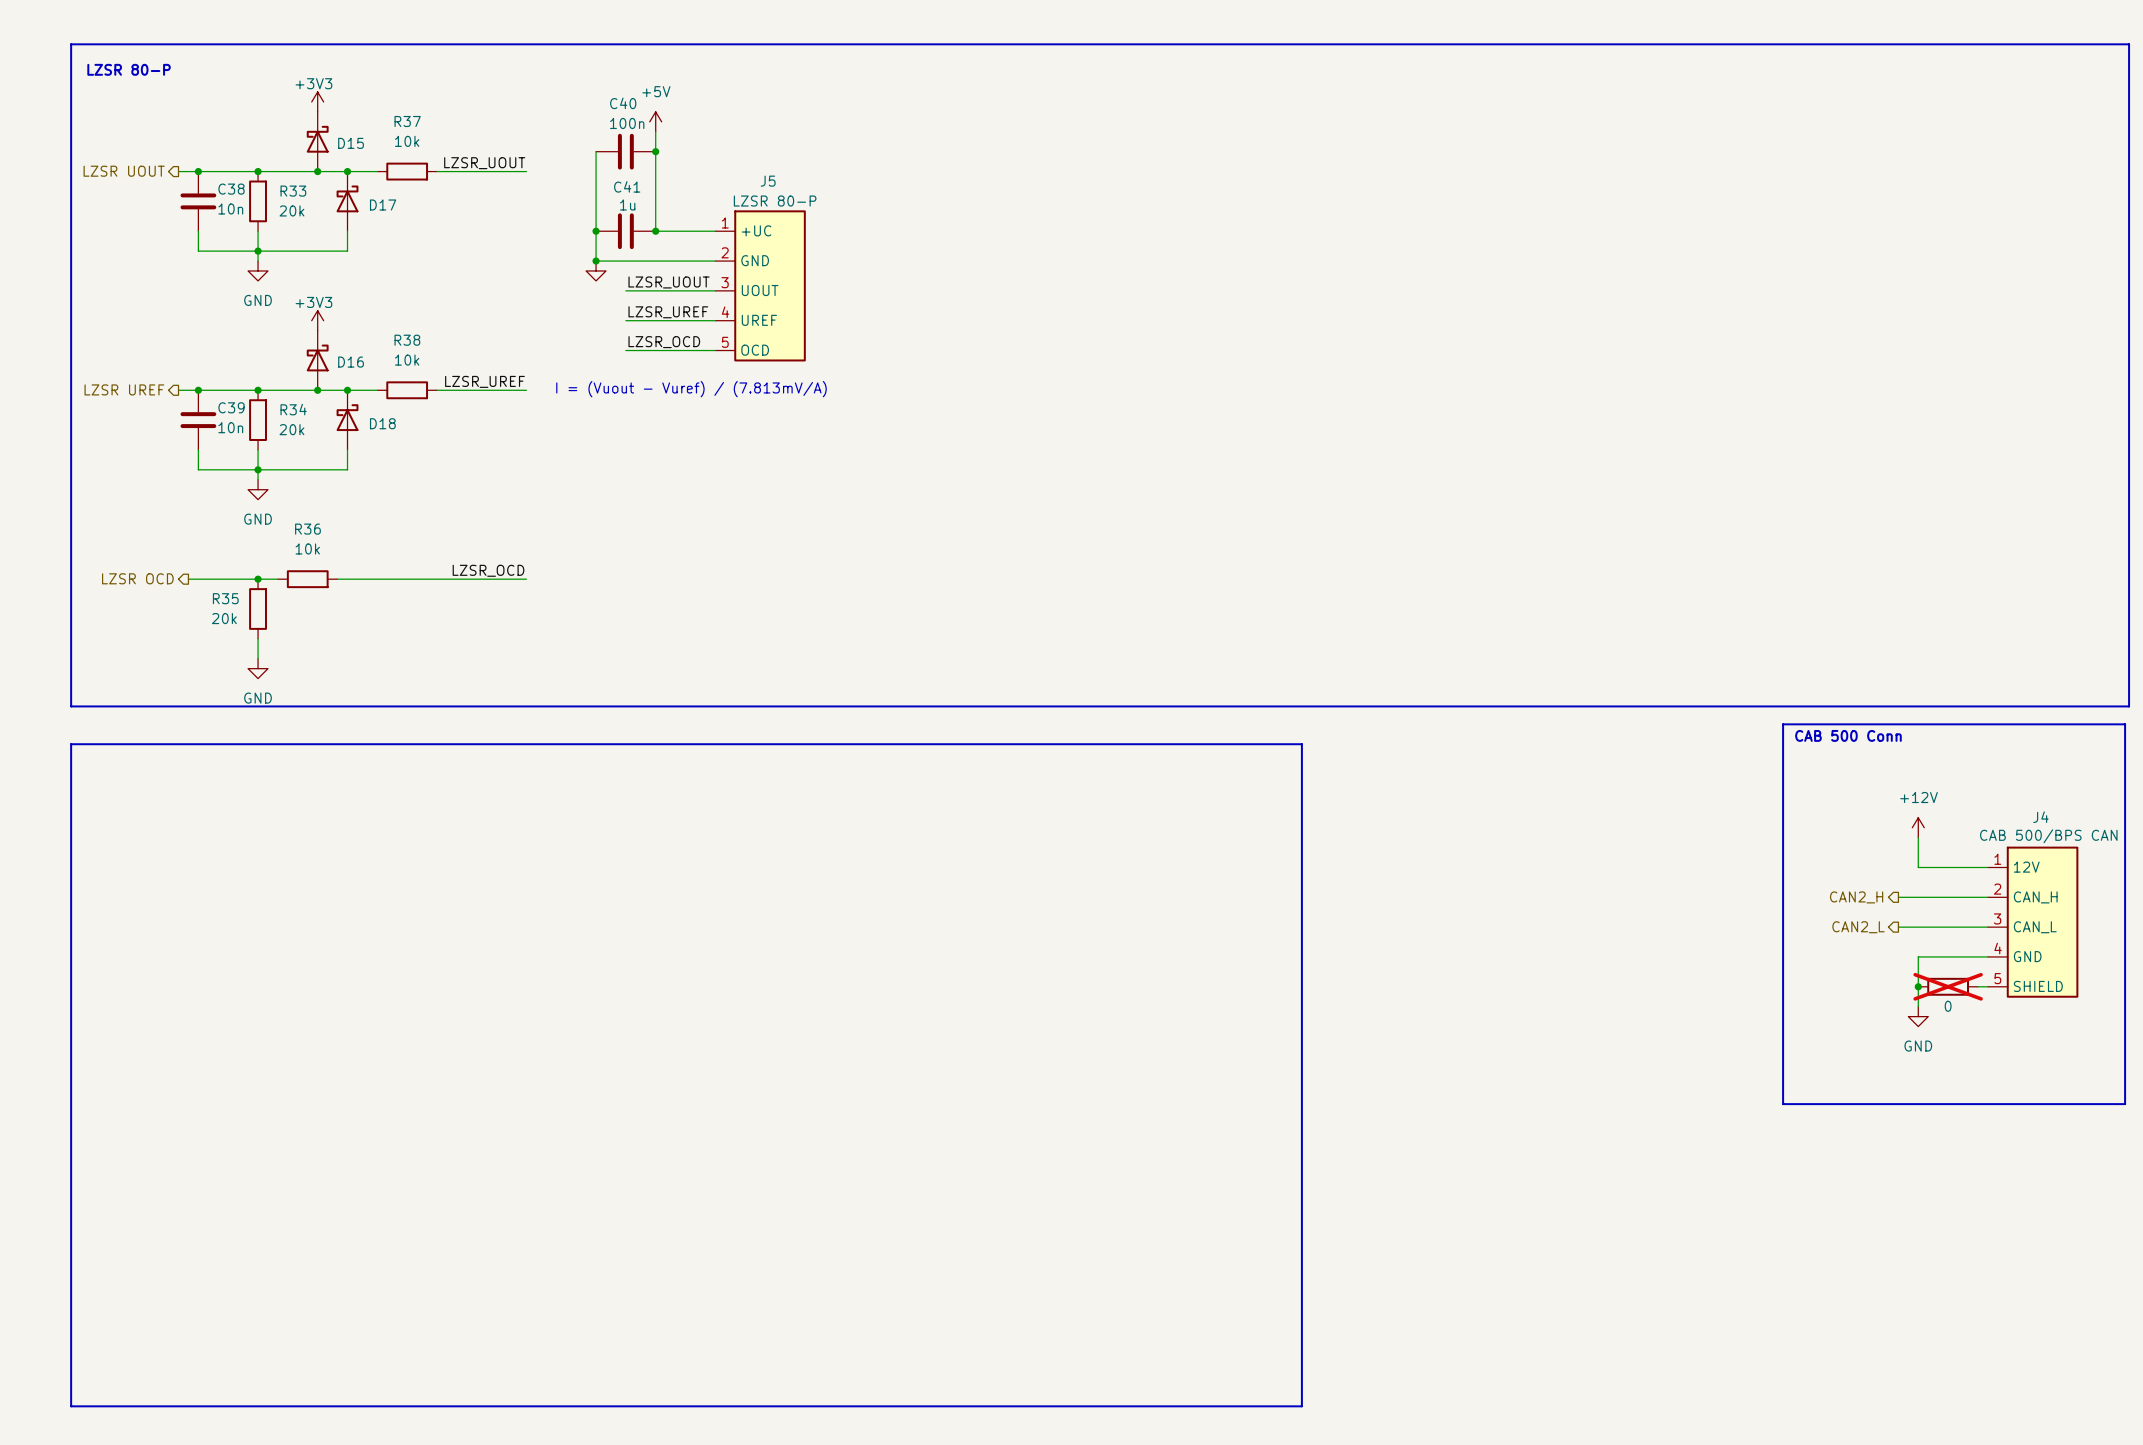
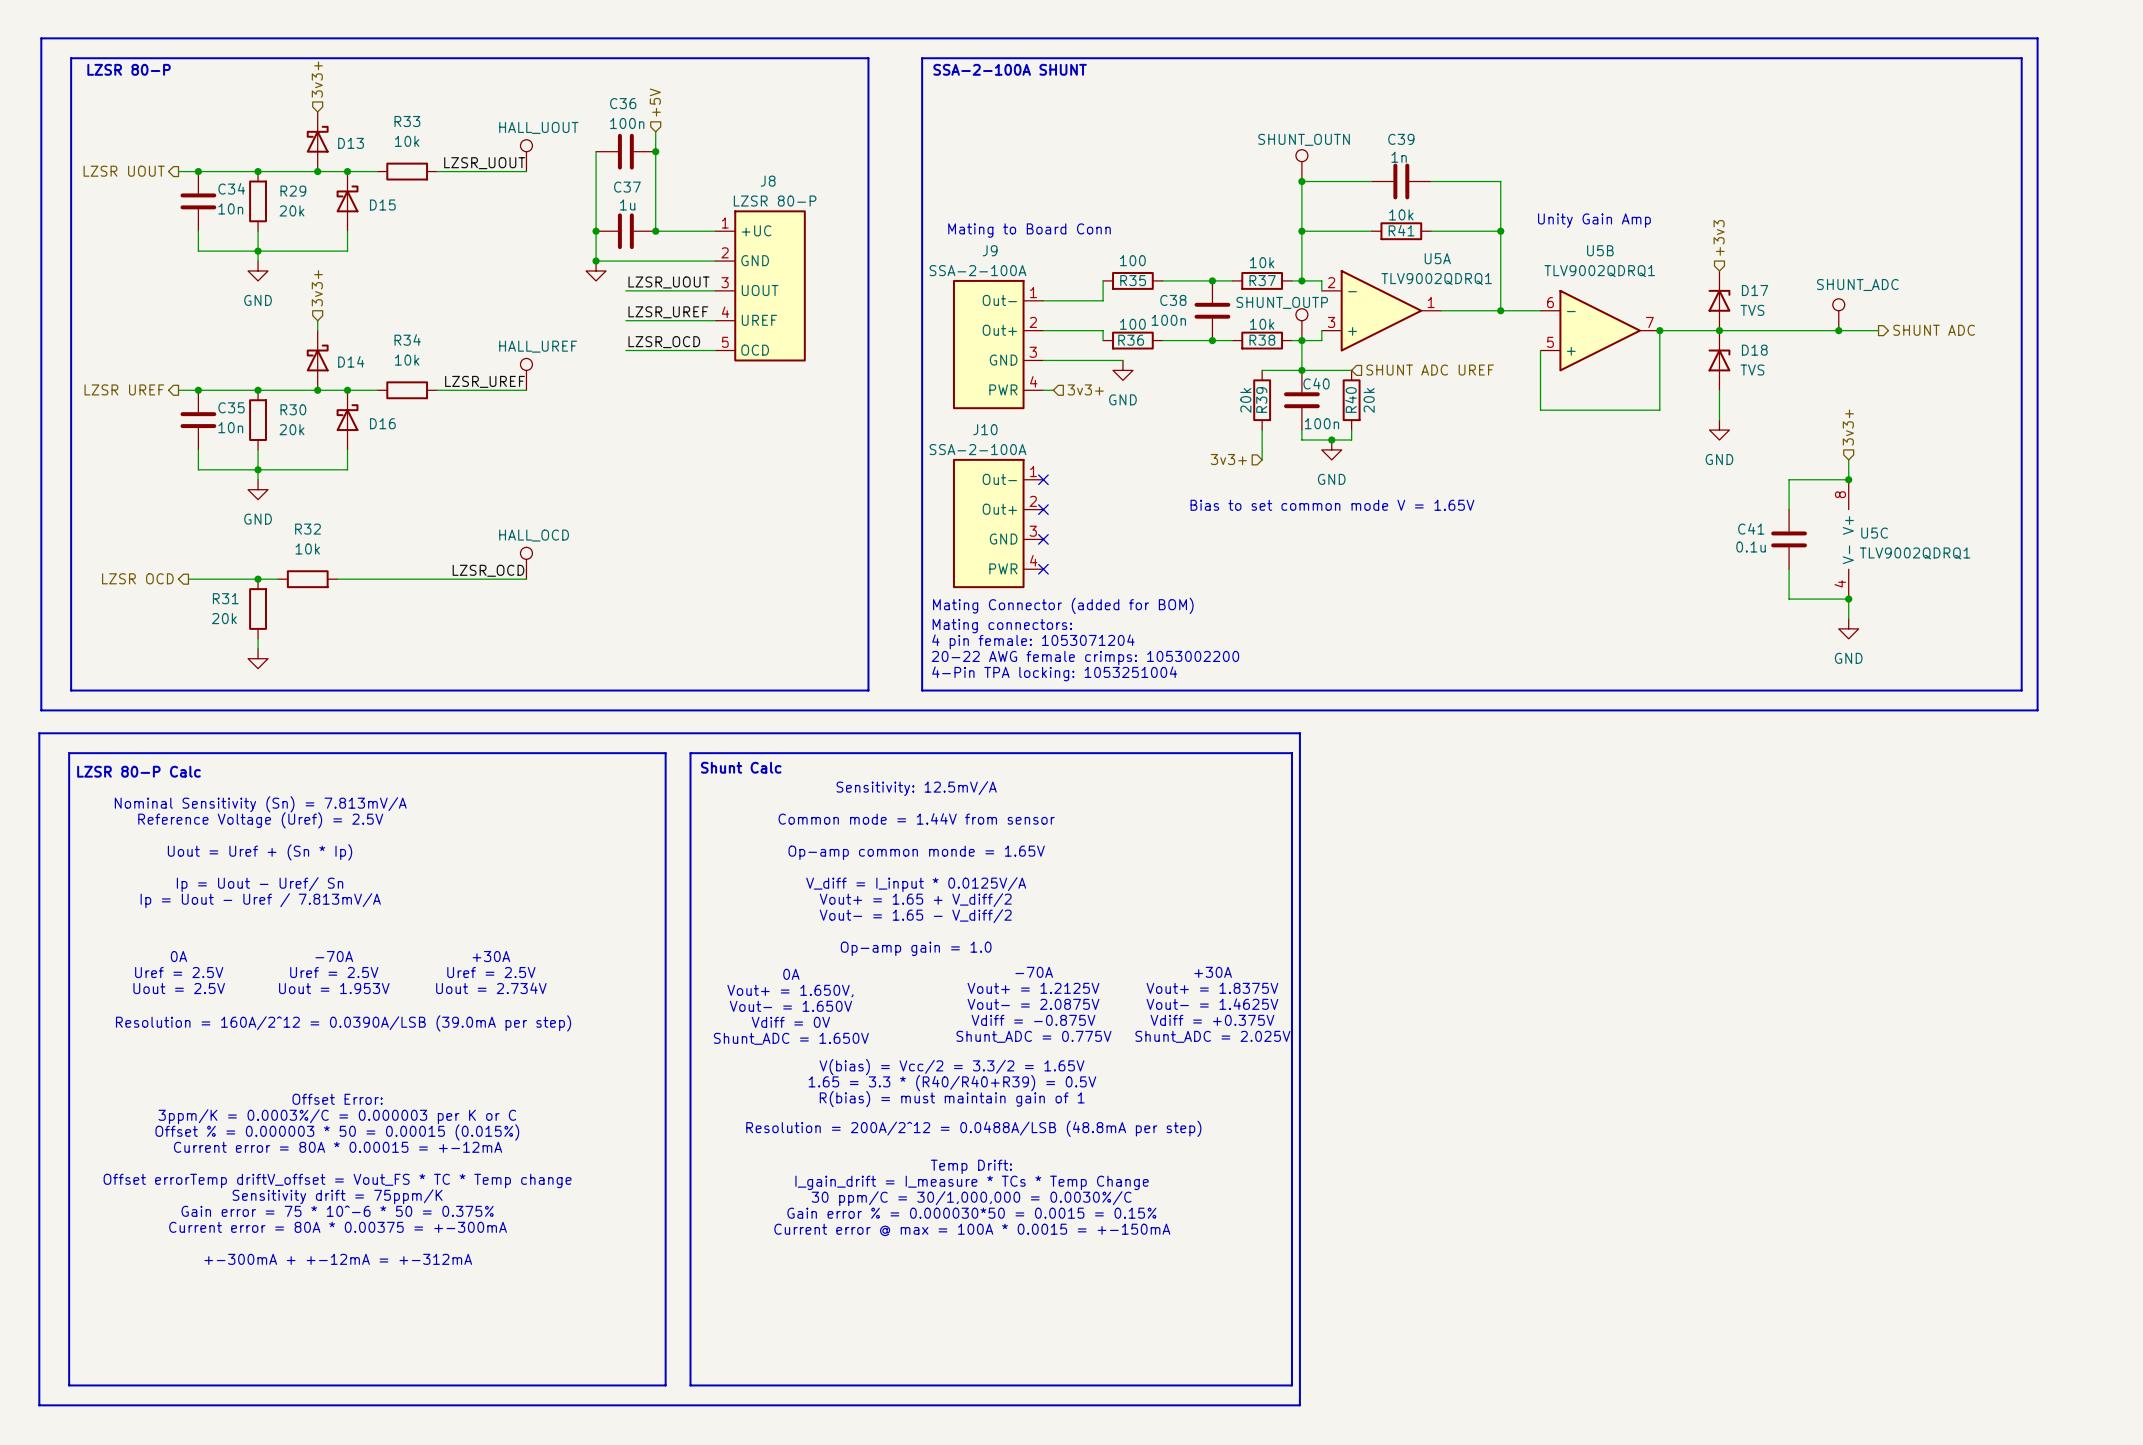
line: none -> (41, 38) (2037, 38) (2037, 710) (41, 710) (41, 38)
line: (71, 58) (71, 44) (2129, 44) (2129, 706) (71, 706) (71, 690) -> (71, 58) (868, 58) (868, 690) (71, 690)
line: none -> (922, 58) (2021, 58) (2021, 690) (922, 690) (922, 58)
text: none -> SSA-2-100A SHUNT (1010, 69)
hierarchical label: none -> 3v3+ (317, 79)
power symbol: +3V3 (317, 101) -> none
hierarchical label: none -> +5V (655, 102)
C40 name: C40 (623, 103) -> C36 (623, 103)
R37 name: R37 (407, 121) -> R33 (407, 121)
power symbol: +5V (655, 121) -> none
D15 name: D15 (351, 143) -> D13 (351, 143)
part: none -> HALL_UOUT (526, 155)
part: none -> SHUNT_OUTN (1301, 165)
J5 name: J5 (768, 181) -> J8 (768, 181)
junction: none -> (1301, 181)
wire: none -> (1371, 181) (1301, 181) (1301, 280)
C39: none -> 1n (1401, 181)
wire: none -> (1431, 181) (1500, 181) (1500, 310)
C41 name: C41 (627, 186) -> C37 (627, 187)
C38 name: C38 (231, 189) -> C34 (231, 188)
R33 name: R33 (293, 191) -> R29 (293, 191)
D17 name: D17 (383, 205) -> D15 (382, 205)
text: none -> Unity Gain Amp (1594, 220)
text: none -> Mating to Board Conn (1029, 230)
wire: none -> (1301, 231) (1371, 231)
junction: none -> (1301, 231)
R41: none -> 10k (1401, 231)
wire: none -> (1431, 231) (1500, 231)
junction: none -> (1500, 231)
hierarchical label: none -> +3v3 (1719, 237)
wire: none -> (1103, 280) (1103, 300) (1043, 300)
R35: none -> 100 (1132, 280)
wire: none -> (1162, 280) (1232, 280)
junction: none -> (1212, 280)
R37: none -> 10k (1262, 280)
wire: none -> (1291, 280) (1321, 280) (1321, 290)
junction: none -> (1301, 280)
hierarchical label: none -> 3v3+ (317, 288)
D17: none -> TVS (1719, 300)
C38: none -> 100n (1212, 310)
U5A: none -> TLV9002QDRQ1 (1381, 310)
wire: none -> (1441, 310) (1540, 310)
junction: none -> (1500, 310)
part: none -> SHUNT_ADC (1838, 314)
power symbol: +3V3 (317, 320) -> none
part: none -> SHUNT_OUTP (1301, 324)
wire: none -> (1043, 330) (1103, 330) (1103, 340)
wire: none -> (1321, 330) (1321, 340) (1291, 340)
U5B: none -> TLV9002QDRQ1 (1600, 330)
junction: none -> (1659, 330)
junction: none -> (1719, 330)
junction: none -> (1838, 330)
wire: none -> (1878, 330) (1659, 330) (1659, 410) (1540, 410) (1540, 350)
hierarchical label: none -> SHUNT ADC (1934, 330)
R38 name: R38 (407, 340) -> R34 (407, 339)
R36: none -> 100 (1132, 340)
wire: none -> (1162, 340) (1232, 340)
junction: none -> (1212, 340)
R38: none -> 10k (1262, 340)
wire: none -> (1301, 340) (1301, 370)
junction: none -> (1301, 340)
J9: none -> SSA-2-100A (998, 344)
wire: none -> (1043, 360) (1122, 360)
D18: none -> TVS (1719, 360)
D16 name: D16 (351, 362) -> D14 (351, 361)
power symbol: none -> GND (1122, 370)
wire: none -> (1262, 370) (1351, 370)
junction: none -> (1301, 370)
hierarchical label: none -> SHUNT ADC UREF (1430, 370)
part: none -> HALL_UREF (526, 374)
text: I = (Vuout - Vuref) / (7.813mV/A) (691, 389) -> none
hierarchical label: none -> 3v3+ (1085, 389)
wire: none -> (1043, 390) (1053, 390)
wire: none -> (1719, 390) (1719, 420)
R39: none -> 20k (1262, 400)
C40: none -> 100n (1301, 400)
R40: none -> 20k (1351, 400)
C39 name: C39 (231, 407) -> C35 (231, 407)
R34 name: R34 (293, 409) -> R30 (293, 409)
D18 name: D18 (382, 423) -> D16 (382, 423)
hierarchical label: none -> 3v3+ (1848, 427)
wire: none -> (1262, 430) (1262, 459)
wire: none -> (1301, 430) (1301, 440) (1351, 440) (1351, 430)
power symbol: none -> GND (1719, 430)
junction: none -> (1331, 440)
power symbol: none -> GND (1331, 449)
hierarchical label: none -> 3v3+ (1228, 459)
wire: none -> (1848, 459) (1848, 479) (1789, 479) (1789, 509)
no-connect mark: none -> (1043, 479)
junction: none -> (1848, 479)
text: none -> Bias to set common mode V = 1.65V (1332, 505)
no-connect mark: none -> (1043, 509)
J10: none -> SSA-2-100A (998, 523)
R36 name: R36 (307, 529) -> R32 (307, 529)
no-connect mark: none -> (1043, 539)
C41: none -> 0.1u (1789, 539)
U5C: none -> TLV9002QDRQ1 (1848, 539)
part: none -> HALL_OCD (526, 563)
no-connect mark: none -> (1043, 569)
wire: none -> (1789, 569) (1789, 599) (1848, 599) (1848, 618)
R35 name: R35 (225, 598) -> R31 (225, 598)
junction: none -> (1848, 599)
text: none -> Mating Connector (added for BOM) (1063, 605)
text: none -> Mating connectors: (1002, 626)
power symbol: none -> GND (1848, 628)
text: none -> 4 pin female: 1053071204 (1033, 641)
power symbol: none -> (258, 658)
text: none -> 20-22 AWG female crimps: 1053002200 (1085, 658)
power symbol: GND (258, 668) -> none
text: none -> 4-Pin TPA locking: 1053251004 (1054, 673)
line: (1783, 724) (2125, 724) (2125, 1104) (1783, 1104) (1783, 724) -> none
text: CAB 500 Conn (1848, 735) -> none
line: (71, 744) (1301, 744) (1301, 1406) (71, 1406) (71, 744) -> (39, 733) (39, 1405) (1299, 1405) (1299, 733) (39, 733)
line: none -> (69, 753) (665, 753) (665, 1385) (69, 1385) (69, 753)
line: none -> (690, 753) (1291, 753) (1291, 1385) (690, 1385) (690, 753)
text: none -> Shunt Calc (741, 767)
text: none -> LZSR 80-P Calc (138, 771)
text: none -> Sensitivity: 12.5mV/A (916, 788)
text: none -> Nominal Sensitivity (Sn) = 7.813mV/A (260, 804)
text: none -> Common mode = 1.44V from sensor (916, 818)
text: none -> Reference Voltage (Uref) = 2.5V (260, 820)
power symbol: +12V (1918, 827) -> none
wire: (1918, 837) (1918, 867) (1987, 867) -> none
text: none -> Uout = Uref + (Sn * Ip) (260, 852)
text: none -> Op-amp common monde = 1.65V (916, 852)
text: none -> Ip = Uout - Uref/ Sn (260, 884)
text: none -> V_diff = I_input * 0.0125V/A (916, 884)
hierarchical label: CAN2_H (1856, 897) -> none
wire: (1898, 897) (1987, 897) -> none
text: none -> Ip = Uout - Uref / 7.813mV/A (260, 900)
text: none -> Vout+ = 1.65 + V_diff/2 (915, 900)
text: none -> Vout- = 1.65 - V_diff/2 (915, 916)
J4: CAB 500/BPS CAN (2033, 922) -> none
hierarchical label: CAN2_L (1858, 927) -> none
wire: (1898, 927) (1987, 927) -> none
text: none -> Op-amp gain = 1.0 (916, 948)
text: none -> 0A (178, 956)
text: none -> -70A (334, 956)
text: none -> +30A (491, 956)
wire: (1987, 956) (1918, 956) (1918, 1006) -> none
text: none -> Uref = 2.5V (179, 972)
text: none -> Uref = 2.5V (334, 972)
text: none -> Uref = 2.5V (491, 972)
text: none -> -70A (1034, 972)
text: none -> +30A (1213, 972)
text: none -> 0A (791, 974)
junction: (1918, 986) -> none
part: 0 (1948, 986) -> none
wire: (1977, 986) (1987, 986) -> none
text: none -> Uout = 2.5V (179, 988)
text: none -> Uout = 1.953V (334, 988)
text: none -> Uout = 2.734V (491, 988)
text: none -> Vout+ = 1.2125V (1033, 988)
text: none -> Vout+ = 1.8375V (1212, 988)
text: none -> Vout+ = 1.650V, (790, 991)
text: none -> Vout- = 2.0875V (1033, 1004)
text: none -> Vout- = 1.4625V (1212, 1004)
text: none -> Vout- = 1.650V (790, 1006)
power symbol: GND (1918, 1016) -> none
text: none -> Vdiff = -0.875V (1033, 1020)
text: none -> Vdiff = +0.375V (1212, 1020)
text: none -> Vdiff = 0V (790, 1022)
text: none -> Resolution = 160A/2^12 = 0.0390A/LSB (39.0mA per step) (343, 1023)
text: none -> Shunt_ADC = 0.775V (1033, 1036)
text: none -> Shunt_ADC = 2.025V (1212, 1036)
text: none -> Shunt_ADC = 1.650V (791, 1038)
text: none -> V(bias) = Vcc/2 = 3.3/2 = 1.65V (951, 1067)
text: none -> 1.65 = 3.3 * (R40/R40+R39) = 0.5V (952, 1083)
text: none -> Offset Error: (337, 1099)
text: none -> R(bias) = must maintain gain of 1 (952, 1099)
text: none -> 3ppm/K = 0.0003%/C = 0.000003 per K or C (337, 1116)
text: none -> Resolution = 200A/2^12 = 0.0488A/LSB (48.8mA per step) (973, 1128)
text: none -> Offset % = 0.000003 * 50 = 0.00015 (0.015%) (337, 1132)
text: none -> Current error = 80A * 0.00015 = +-12mA (338, 1147)
text: none -> Temp Drift: (971, 1166)
text: none -> Offset errorTemp driftV_offset = Vout_FS * TC * Temp change (337, 1180)
text: none -> I_gain_drift = I_measure * TCs * Temp Change (972, 1182)
text: none -> Sensitivity drift = 75ppm/K (337, 1196)
text: none -> 30 ppm/C = 30/1,000,000 = 0.0030%/C (971, 1198)
text: none -> Gain error = 75 * 10^-6 * 50 = 0.375% (337, 1211)
text: none -> Gain error % = 0.000030*50 = 0.0015 = 0.15% (971, 1213)
text: none -> Current error = 80A * 0.00375 = +-300mA (338, 1227)
text: none -> Current error @ max = 100A * 0.0015 = +-150mA (972, 1229)
text: none -> +-300mA + +-12mA = +-312mA (338, 1259)

